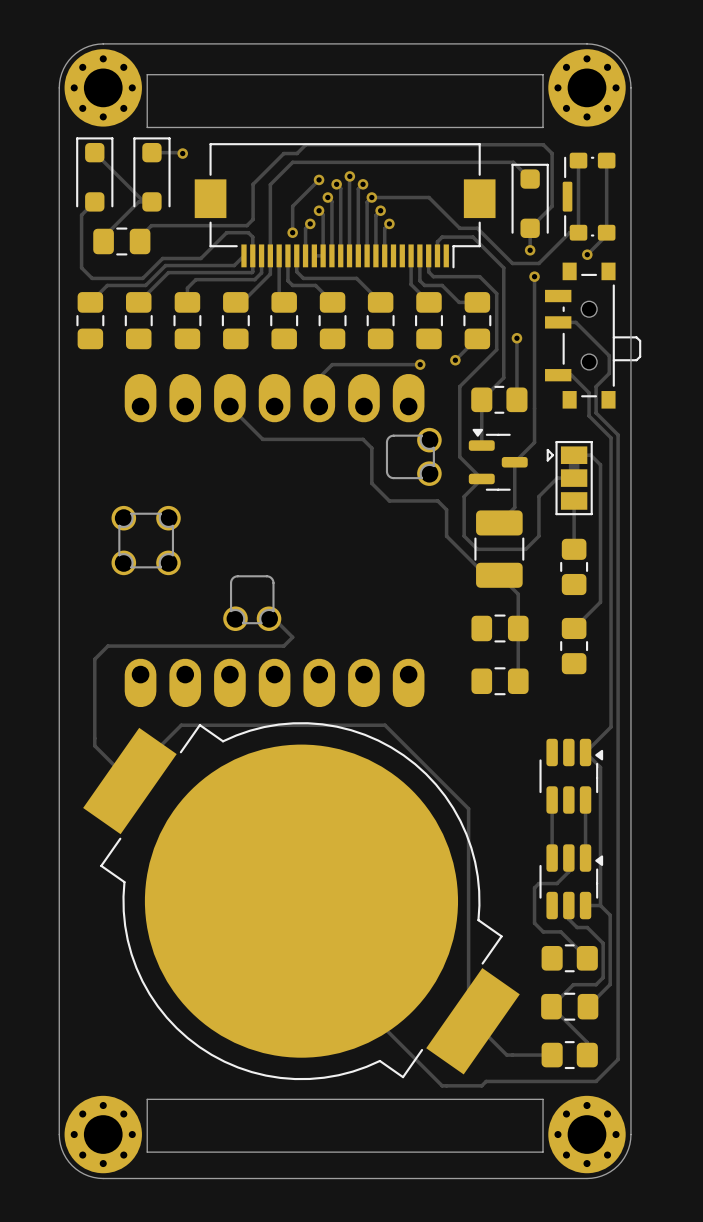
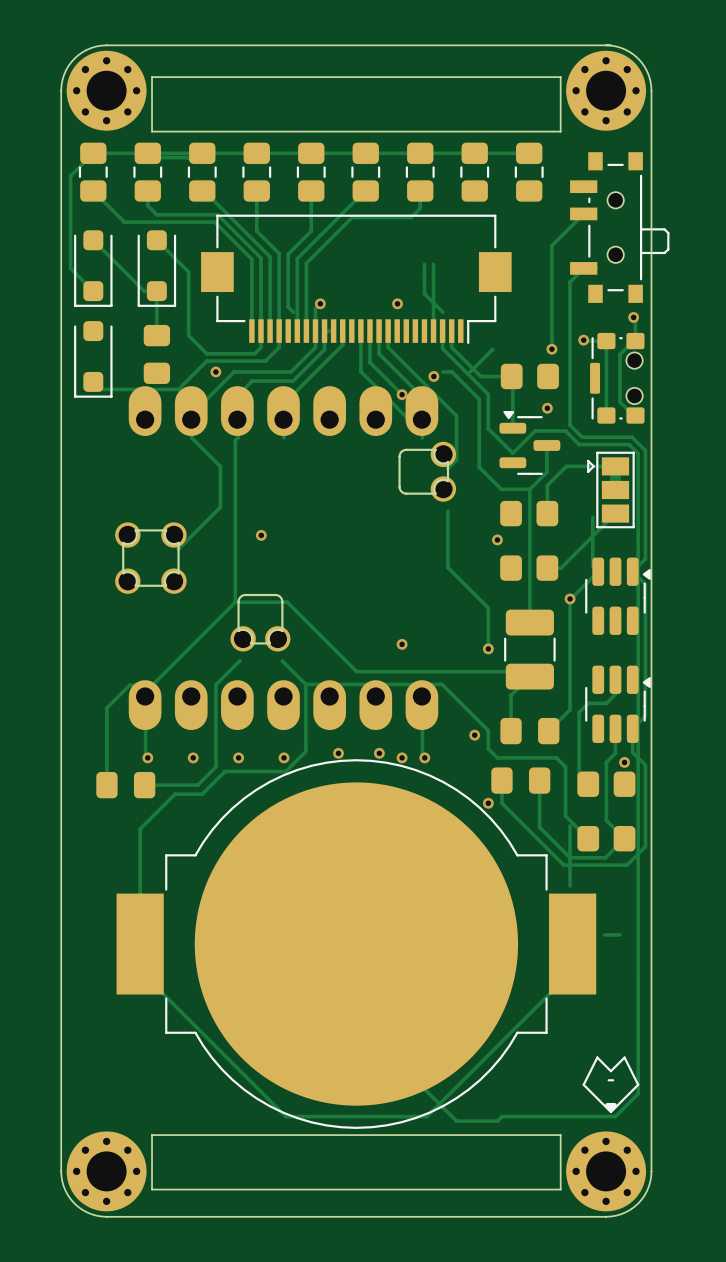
part footprint: [76, 137, 114, 212] -> [78, 142, 108, 202]
part footprint: [133, 137, 171, 212] -> [133, 142, 163, 202]
track: none -> (529, 153) (93, 153) (70, 176) (70, 268) (93, 291)
track: (94, 152) (144, 201) -> none
via: (182, 153) -> none
track: (578, 160) (578, 232) (569, 232) (538, 263) (512, 263) (477, 228) (459, 228) (429, 197) (371, 197) (367, 202) (367, 255) -> none
track: (606, 160) (606, 235) (587, 254) -> none
part: none -> (202, 172)
part: none -> (256, 172)
part: none -> (311, 172)
part: none -> (365, 172)
part: none -> (420, 172)
part: none -> (474, 172)
part: none -> (529, 172)
track: (349, 176) (349, 255) -> none
via: (349, 176) -> none
track: (319, 179) (292, 206) (292, 232) -> none
via: (319, 179) -> none
track: (530, 179) (513, 162) (292, 162) (270, 184) (270, 245) -> (256, 190) (256, 231) (279, 253)
track: none -> (93, 190) (124, 222) (214, 222) (251, 259) (251, 331)
track: none -> (202, 190) (270, 256) (270, 264)
track: none -> (311, 190) (311, 231) (288, 254) (288, 264)
track: (336, 184) (340, 188) (340, 255) -> none
via: (336, 184) -> none
track: none -> (365, 190) (297, 258) (297, 264)
track: (363, 184) (358, 189) (358, 255) -> none
via: (363, 184) -> none
track: none -> (420, 190) (420, 208) (411, 217) (352, 217) (306, 264)
part: (589, 196) -> none
track: (327, 197) (331, 201) (331, 255) -> none
via: (327, 197) -> none
via: (371, 197) -> none
part: (530, 200) -> none
track: (94, 201) (81, 215) (81, 267) (92, 278) (142, 278) (162, 258) (200, 258) (226, 232) (248, 232) (252, 237) (252, 249) -> (147, 190) (147, 205) (156, 214) (217, 214) (260, 258)
track: (151, 201) (138, 201) (103, 237) -> none
part position: (345, 205) -> (356, 279)
track: none -> (583, 213) (551, 245) (551, 285)
track: (319, 210) (323, 214) (323, 255) (314, 255) -> none
via: (319, 210) -> none
track: (380, 210) (375, 215) (375, 255) -> none
via: (380, 210) -> none
track: (310, 223) (305, 228) (305, 255) -> none
via: (310, 223) -> none
track: (389, 223) (384, 228) (384, 255) -> none
via: (389, 223) -> none
track: none -> (93, 240) (144, 291) (156, 291) (156, 335)
via: (292, 232) -> none
track: (140, 237) (151, 225) (246, 225) (253, 219) (253, 184) (283, 153) (297, 153) (305, 144) (543, 144) (552, 153) (552, 206) (530, 228) (530, 250) -> none
part: (121, 241) -> none
via: (530, 250) -> none
via: (587, 254) -> none
track: (243, 255) (234, 265) (165, 265) (145, 285) (107, 285) (90, 302) -> none
track: (428, 255) (428, 271) (433, 276) (479, 276) (496, 293) (496, 349) (459, 386) (459, 456) (481, 478) (464, 496) (464, 536) (477, 549) (525, 549) (538, 536) (538, 496) (557, 478) (574, 478) -> none
track: (437, 255) (437, 241) (442, 237) (472, 237) (503, 267) (503, 377) (481, 399) (481, 445) -> none
track: none -> (583, 268) (570, 282) (570, 425) (582, 437) (632, 437) (645, 450) (645, 559) (632, 571) (645, 584) (645, 716) (632, 728) (632, 752) (645, 765) (645, 846) (627, 865) (563, 865) (501, 803) (501, 780)
part: none -> (93, 268)
part: none -> (156, 268)
track: (252, 271) (168, 272) (138, 302) -> (260, 280) (260, 347) (254, 353) (206, 353) (188, 335) (188, 272) (156, 240)
track: (296, 271) (303, 278) (356, 278) (380, 302) -> (306, 280) (306, 331)
track: (261, 272) (254, 279) (195, 279) (187, 288) (187, 302) -> (270, 281) (270, 331)
track: (270, 274) (242, 302) (235, 302) -> (279, 283) (279, 347) (265, 361) (206, 361) (178, 389) (100, 389) (93, 381)
via: (534, 276) -> none
track: (287, 280) (292, 285) (315, 285) (332, 302) -> (297, 289) (297, 331)
track: (419, 280) (424, 285) (442, 285) (459, 302) (477, 302) -> (433, 289) (433, 331)
track: none -> (320, 303) (315, 308) (315, 347) (290, 371) (234, 371) (191, 414) (191, 437) (220, 466) (220, 507) (178, 549)
via: none -> (320, 303)
via: none -> (397, 303)
track: none -> (633, 317) (635, 319) (635, 341) (620, 354) (620, 402) (635, 415)
via: none -> (633, 317)
part: (90, 320) -> none
part: (138, 320) -> none
part: (187, 320) -> none
part: (235, 320) -> none
part: (284, 320) -> none
track: none -> (333, 331) (324, 331) (324, 349) (293, 381) (252, 381) (237, 395) (237, 437) (235, 440) (235, 602)
track: none -> (342, 331) (342, 345) (284, 403) (284, 437)
part: (332, 320) -> none
track: none -> (360, 331) (360, 371) (422, 433) (422, 437)
track: none -> (369, 331) (369, 362) (402, 394)
track: none -> (379, 331) (379, 353) (420, 394)
track: none -> (388, 331) (388, 347) (456, 415) (456, 459) (447, 468)
part: (380, 320) -> none
part: (429, 320) -> none
track: none -> (451, 331) (451, 347) (480, 376) (512, 377) (512, 428)
part: (477, 320) -> none
track: (558, 322) (575, 322) (609, 355) (609, 373) (596, 386) (596, 413) (618, 434) (618, 439) -> (442, 331) (442, 348) (488, 394) (488, 428) (512, 453) (535, 430) (565, 430) (579, 444) (629, 444) (638, 453)
track: none -> (583, 340) (606, 341) (606, 415)
via: none -> (583, 340)
part position: (593, 335) -> (619, 227)
track: (516, 338) (516, 399) -> none
via position: (516, 338) -> (551, 349)
track: (534, 338) (534, 442) (514, 462) (514, 507) (499, 522) -> none
part: none -> (156, 354)
part: none -> (93, 359)
via: none -> (215, 371)
track: none -> (442, 371) (452, 371) (479, 399) (479, 467) (501, 489) (529, 489)
via: (455, 360) -> none
track: (420, 364) (332, 364) (319, 377) (319, 406) -> none
part: none -> (529, 376)
part: none -> (617, 378)
track: (558, 375) (571, 375) (589, 392) (589, 415) (611, 437) (611, 727) (585, 752) (600, 767) (600, 905) (610, 915) (610, 984) (587, 1006) -> none
via: none -> (402, 394)
via: none -> (547, 408)
part: (499, 399) -> none
track: (229, 406) (262, 439) (363, 439) (371, 448) (371, 483) (389, 500) (437, 500) (446, 509) (446, 536) (485, 575) (499, 575) (518, 594) (518, 681) -> none
track: none -> (546, 445) (546, 472) (529, 489)
track: none -> (615, 466) (566, 466) (547, 485) (547, 513)
track: (574, 455) (590, 455) (600, 464) (600, 602) (574, 628) -> none
part position: (498, 459) -> (529, 442)
track: none -> (529, 489) (529, 622)
part position: (569, 478) -> (610, 489)
track: none -> (447, 511) (447, 567) (488, 608) (488, 648)
part: none -> (529, 513)
track: none -> (615, 513) (560, 568) (547, 568)
part footprint: [474, 510, 525, 588] -> [500, 555, 559, 581]
via: none -> (261, 535)
via: none -> (497, 539)
track: none -> (598, 571) (570, 598) (570, 709) (548, 731)
part: (574, 566) -> none
part: none -> (618, 596)
via: none -> (570, 598)
track: none -> (235, 602) (287, 602) (356, 671) (524, 671) (529, 676) (511, 695) (511, 731)
track: none -> (235, 602) (152, 685) (129, 685) (106, 707) (106, 785)
part footprint: [471, 614, 529, 643] -> [504, 609, 556, 690]
track: (272, 622) (277, 621) (292, 637) (283, 646) (107, 646) (94, 659) (94, 745) (129, 781) -> none
via: none -> (402, 644)
via: none -> (488, 648)
track: none -> (239, 661) (215, 684) (215, 766) (197, 785) (144, 785)
track: none -> (282, 660) (305, 684)
part: (574, 646) -> none
track: none -> (615, 679) (615, 694) (606, 703) (588, 703) (579, 712) (579, 775) (588, 784)
track: none -> (305, 684) (305, 751) (285, 771) (224, 771) (202, 794) (175, 794) (140, 829) (140, 970) (285, 1116) (426, 1116) (572, 970) (572, 944)
track: none -> (305, 684) (442, 684) (488, 730) (488, 748) (497, 757) (556, 757) (565, 766) (565, 816) (588, 838)
part: (500, 681) -> none
track: none -> (145, 714) (145, 755) (147, 757)
track: none -> (422, 714) (422, 755) (424, 757)
track: none -> (615, 728) (615, 753) (606, 762) (606, 820) (624, 838) (605, 857) (570, 857) (539, 827) (539, 780)
part: none -> (529, 731)
via: none -> (474, 735)
via: none -> (338, 753)
via: none -> (379, 753)
via: none -> (147, 757)
via: none -> (193, 757)
via: none -> (238, 757)
via: none -> (284, 757)
via: none -> (402, 757)
via: none -> (424, 757)
via: none -> (624, 762)
part: none -> (520, 780)
part: none -> (606, 784)
part: none -> (125, 785)
part position: (571, 776) -> (618, 704)
via: none -> (488, 803)
track: (125, 781) (181, 725) (385, 725) (468, 808) (468, 1021) -> none
track: (585, 799) (585, 858) -> none
part: none -> (606, 838)
track: (568, 858) (568, 871) (557, 883) (538, 883) (534, 887) (534, 923) (543, 931) (560, 931) (587, 958) -> none
part: (571, 881) -> none
part: (301, 901) -> none
track: (568, 905) (568, 919) (577, 927) (587, 927) (603, 943) (603, 977) (596, 984) (573, 984) (551, 1006) (587, 1042) (587, 1055) -> none
part: none -> (356, 944)
part: (569, 958) -> none
part: (569, 1006) -> none
track: (473, 1021) (506, 1055) (552, 1055) -> none
line: none -> (624, 1057) (638, 1084) (610, 1112) (583, 1084) (597, 1057) (610, 1071) (624, 1057)
line: none -> (613, 1080) (608, 1080)
part: (569, 1055) -> none
drawing: none -> [605, 1102, 617, 1112]

